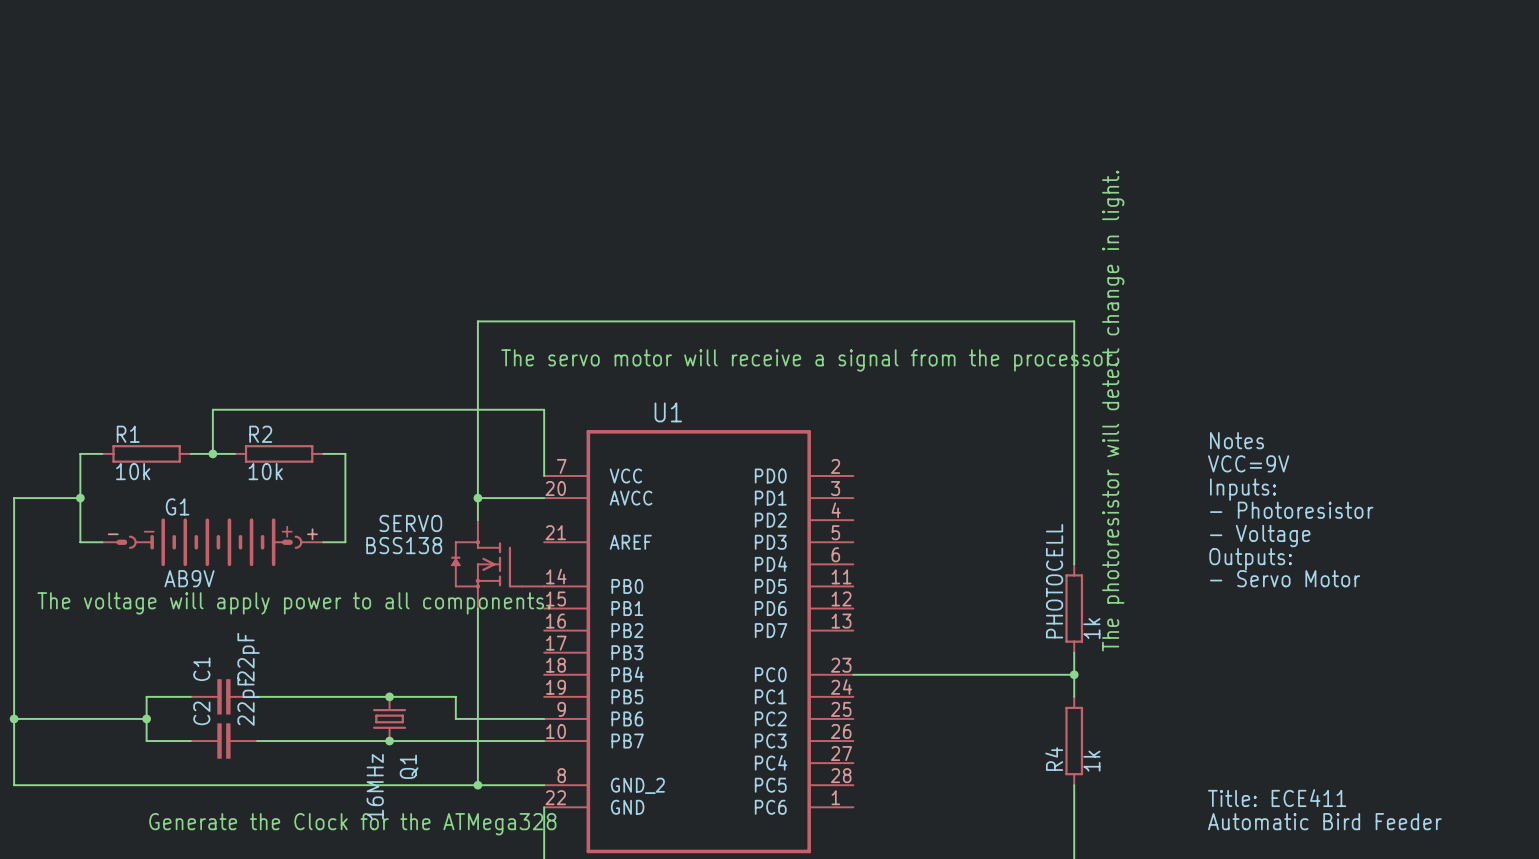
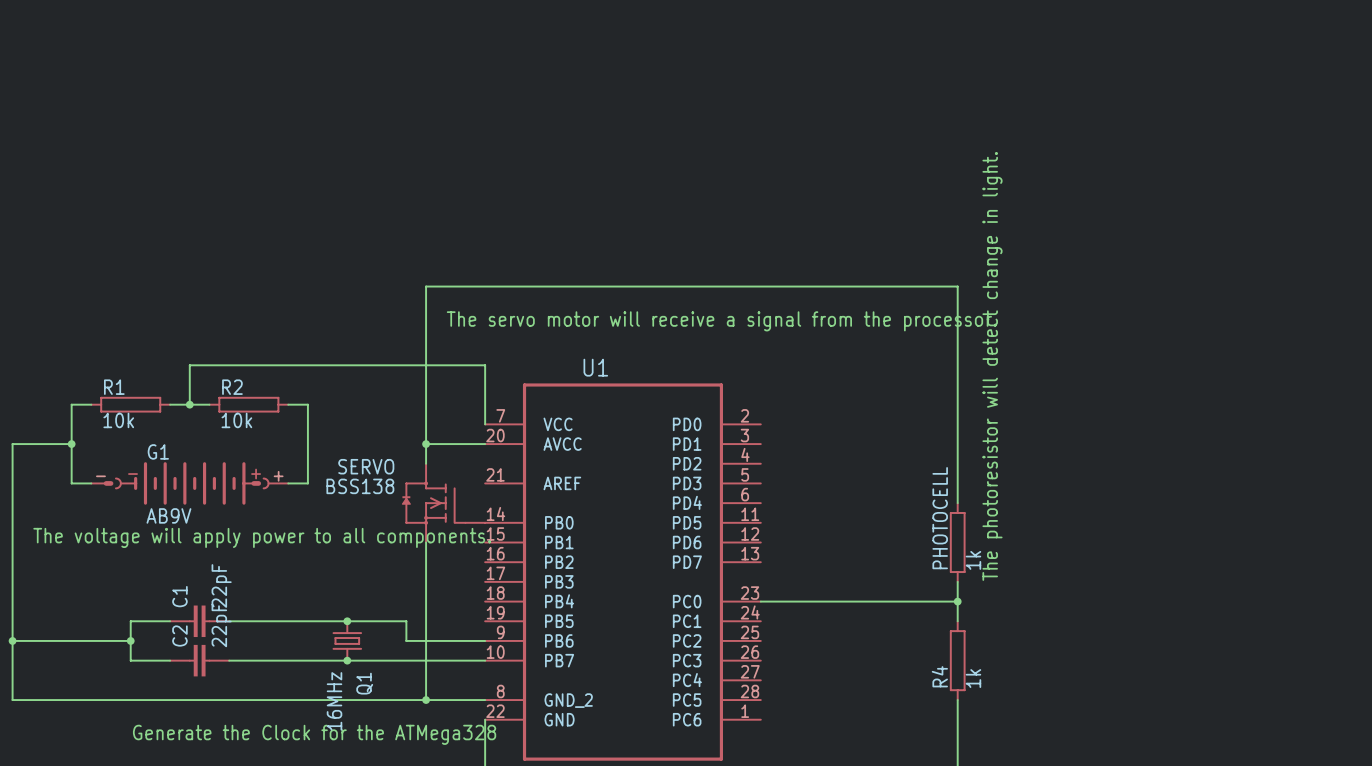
text: Notes (1237, 440) -> none
text: VCC=9V (1248, 463) -> none
text: Inputs: (1243, 489) -> none
text: - Photoresistor (1291, 510) -> none
text: - Voltage (1260, 536) -> none
text: Outputs: (1250, 559) -> none
text: - Servo Motor (1285, 578) -> none
text: Title: ECE411 (1277, 798) -> none
text: Automatic Bird Feeder (1324, 821) -> none

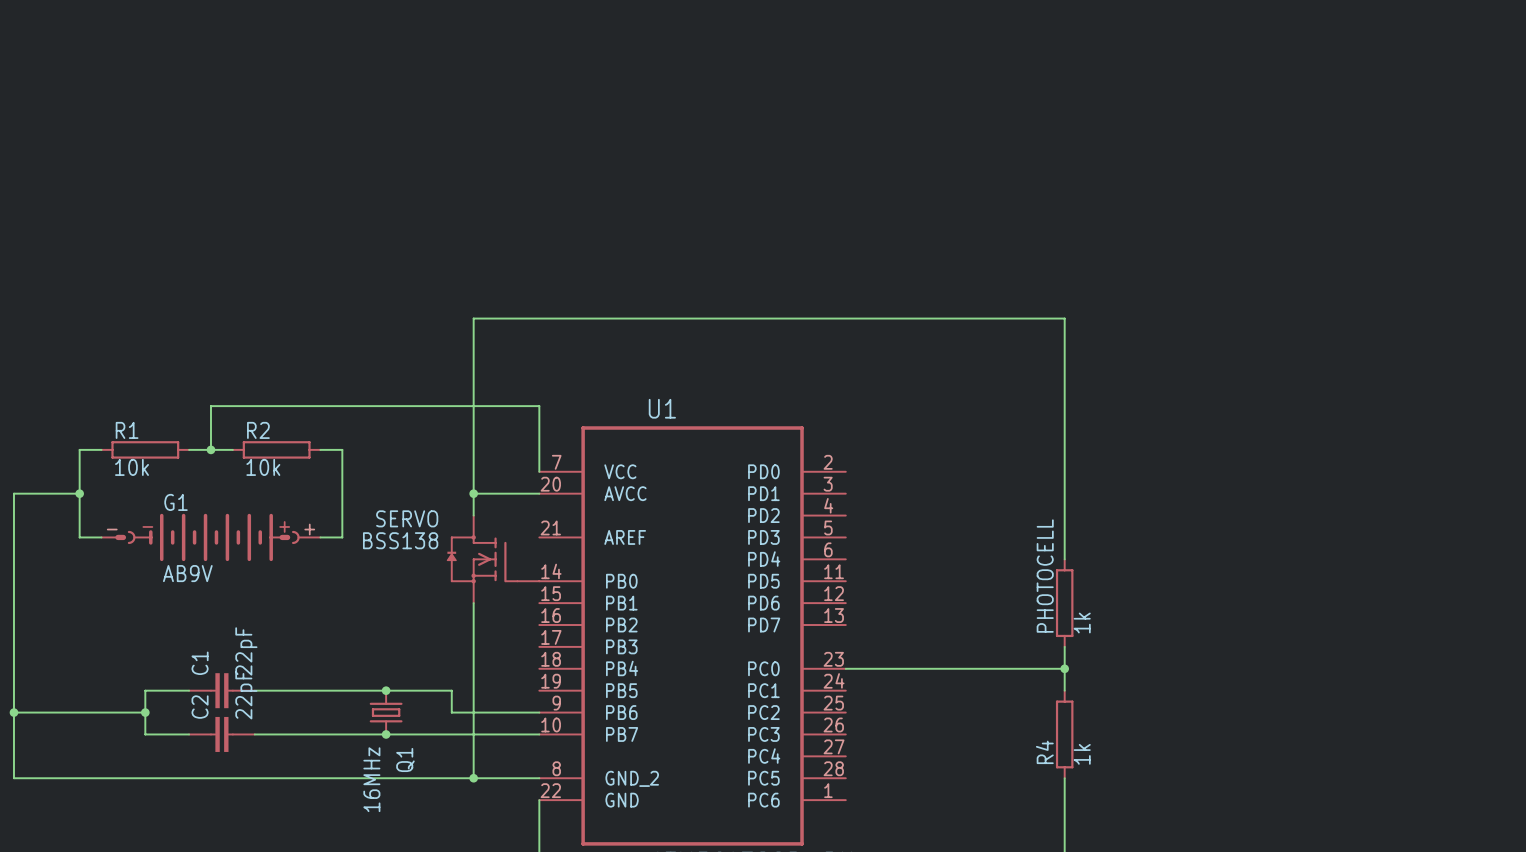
text: The servo motor will receive a signal from the processor. (721, 321) -> none
text: The photoresistor will detect change in light. (992, 366) -> none
text: The voltage will apply power to all components. (262, 537) -> none
text: Generate the Clock for the ATMega328 (314, 734) -> none

